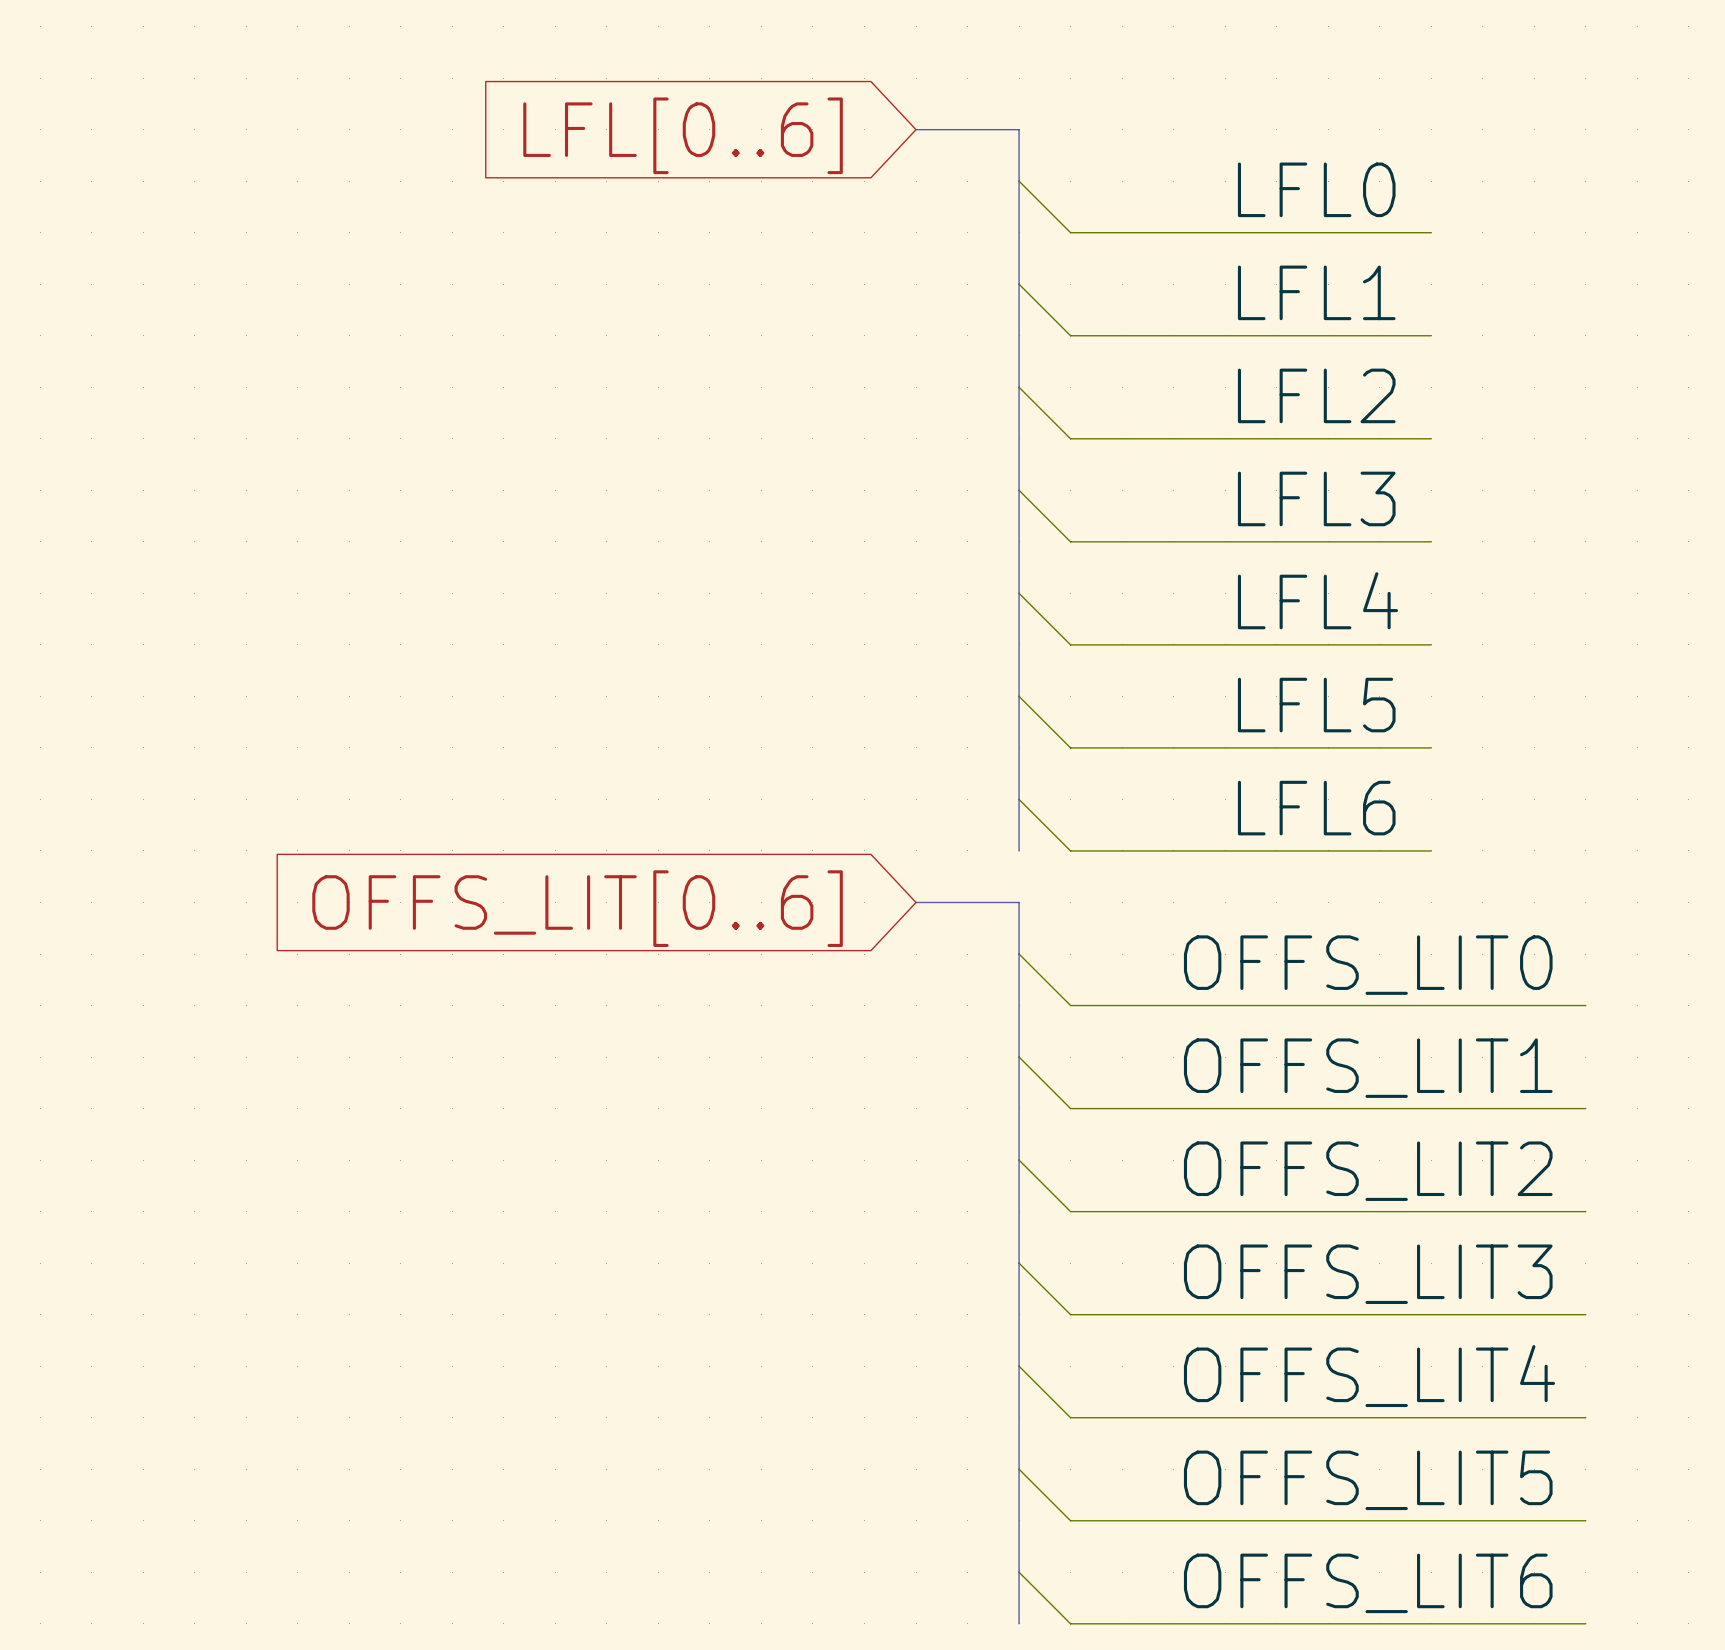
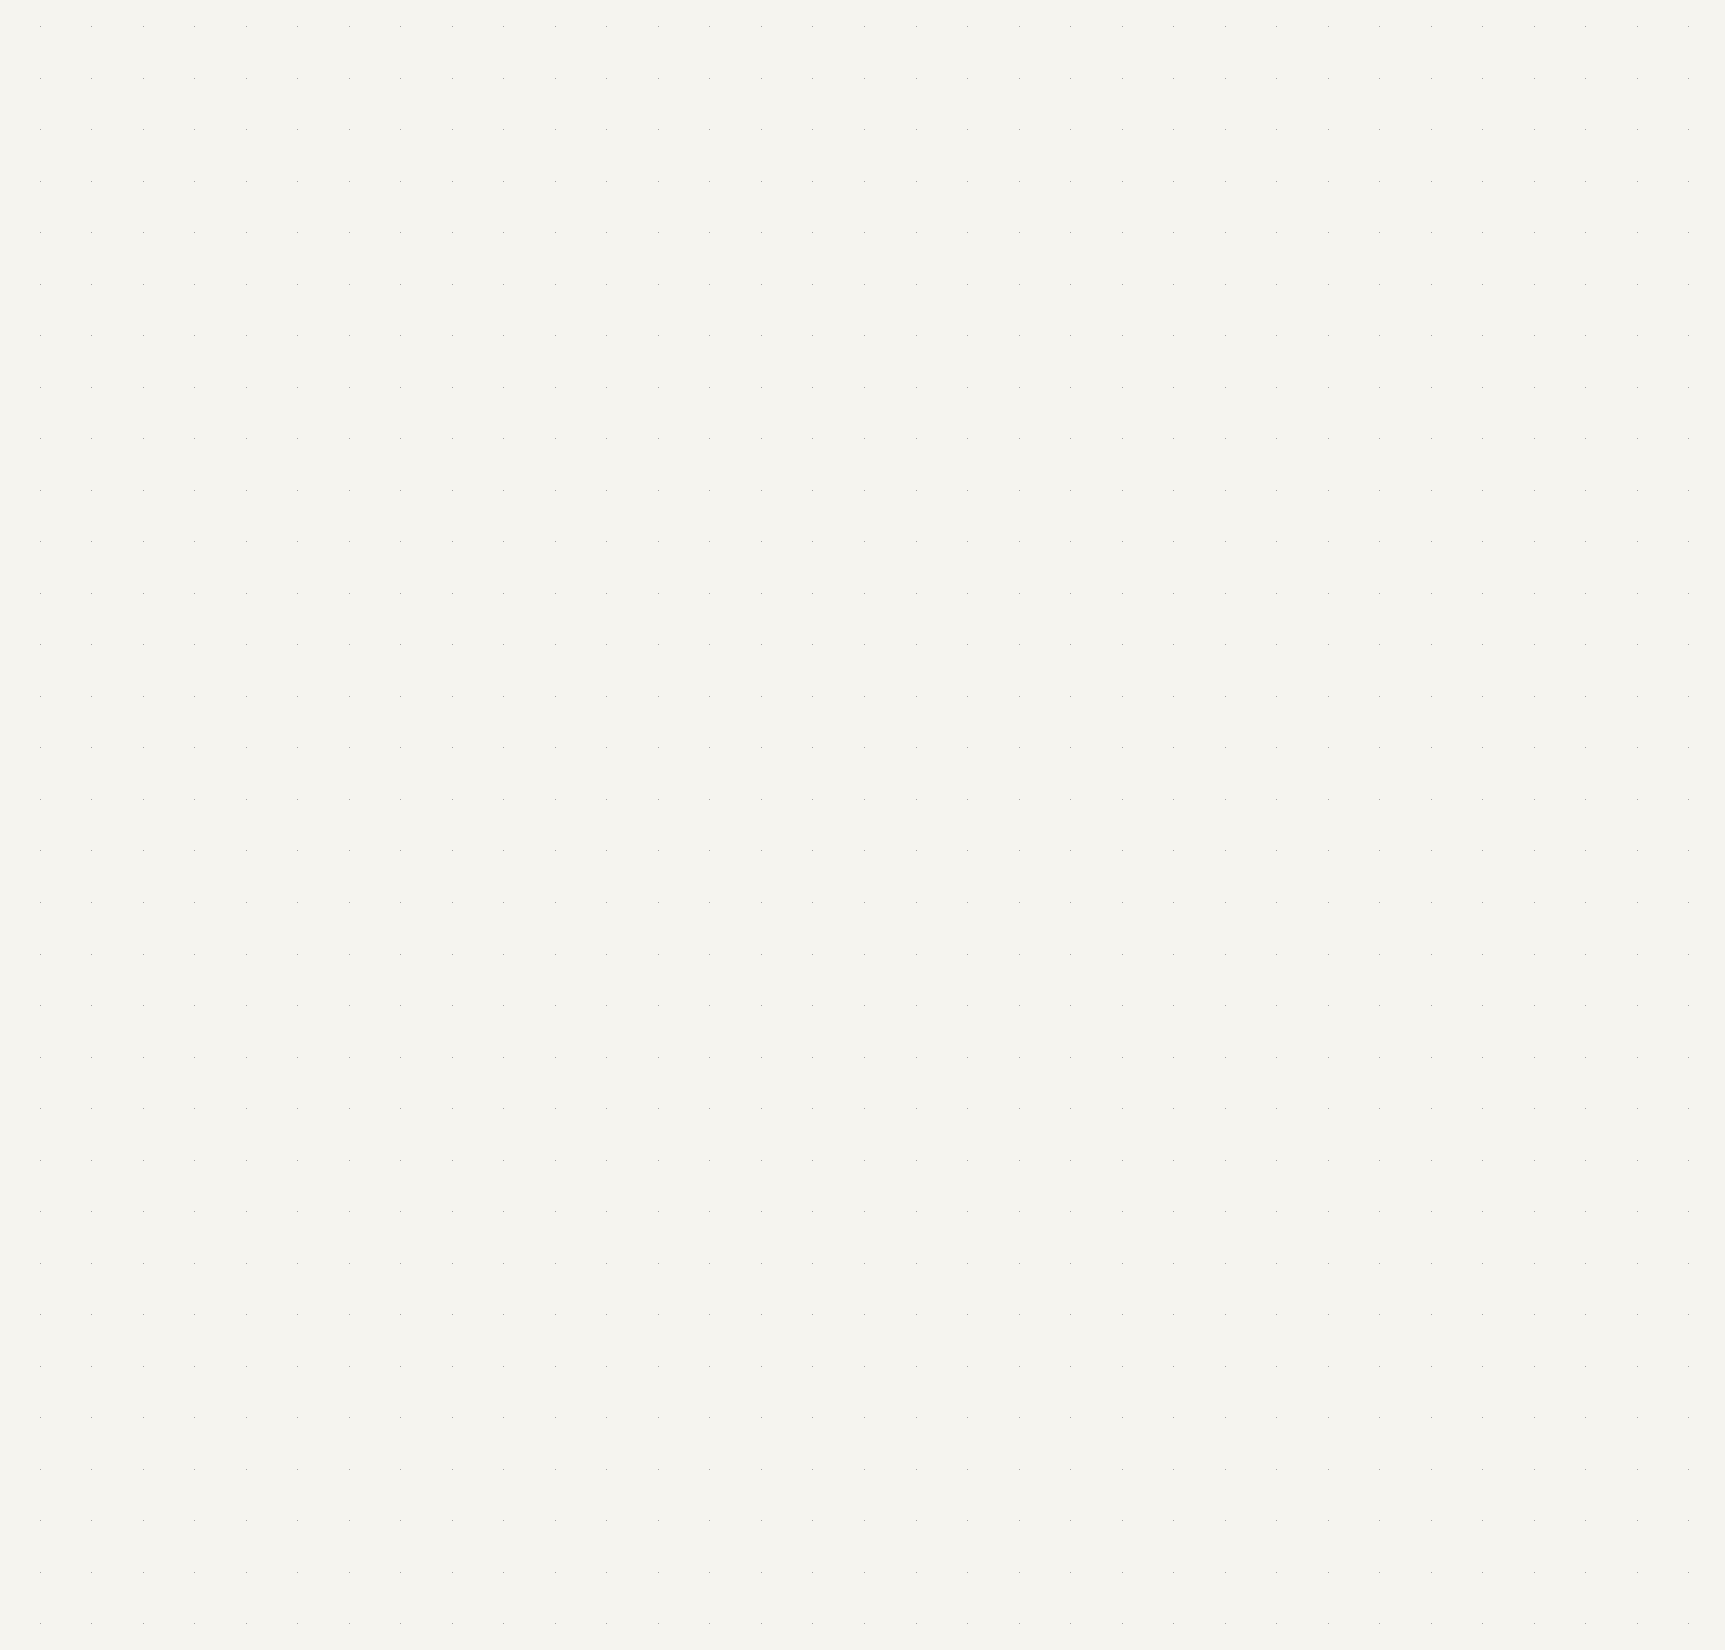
bus: (916, 129) (1019, 129) (1019, 850) -> none
global label: LFL[0..6] (683, 135) -> none
wire: (1019, 181) (1070, 232) (1431, 232) -> none
label: LFL0 (1316, 189) -> none
wire: (1019, 284) (1070, 335) (1431, 335) -> none
label: LFL1 (1316, 292) -> none
wire: (1019, 387) (1070, 438) (1431, 438) -> none
label: LFL2 (1316, 395) -> none
wire: (1019, 490) (1070, 541) (1431, 541) -> none
label: LFL3 (1316, 498) -> none
wire: (1019, 593) (1070, 644) (1431, 644) -> none
label: LFL4 (1317, 600) -> none
wire: (1019, 696) (1070, 747) (1431, 747) -> none
label: LFL5 (1316, 705) -> none
wire: (1019, 799) (1070, 850) (1431, 850) -> none
label: LFL6 (1316, 808) -> none
bus: (916, 902) (1019, 902) (1019, 1623) -> none
global label: OFFS_LIT[0..6] (577, 908) -> none
wire: (1019, 954) (1070, 1005) (1585, 1005) -> none
label: OFFS_LIT0 (1368, 965) -> none
wire: (1019, 1057) (1070, 1108) (1585, 1108) -> none
label: OFFS_LIT1 (1368, 1068) -> none
wire: (1019, 1160) (1070, 1211) (1585, 1211) -> none
label: OFFS_LIT2 (1368, 1171) -> none
wire: (1019, 1263) (1070, 1314) (1585, 1314) -> none
label: OFFS_LIT3 (1368, 1274) -> none
wire: (1019, 1366) (1070, 1417) (1585, 1417) -> none
label: OFFS_LIT4 (1369, 1376) -> none
wire: (1019, 1469) (1070, 1520) (1585, 1520) -> none
label: OFFS_LIT5 (1368, 1480) -> none
wire: (1019, 1572) (1070, 1623) (1585, 1623) -> none
label: OFFS_LIT6 (1368, 1583) -> none

